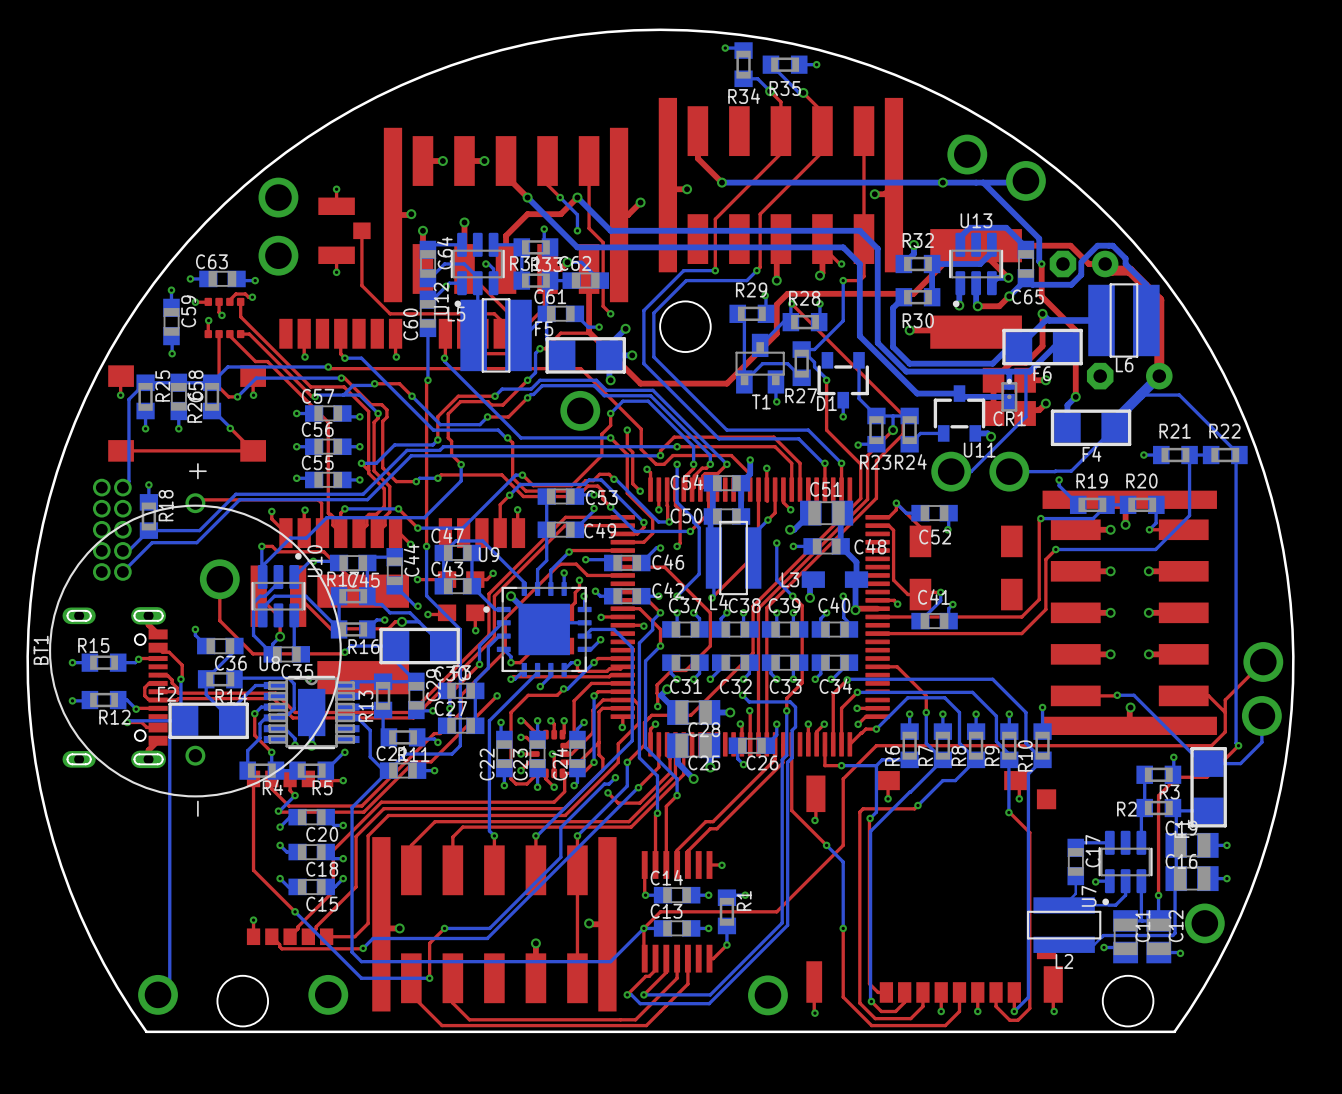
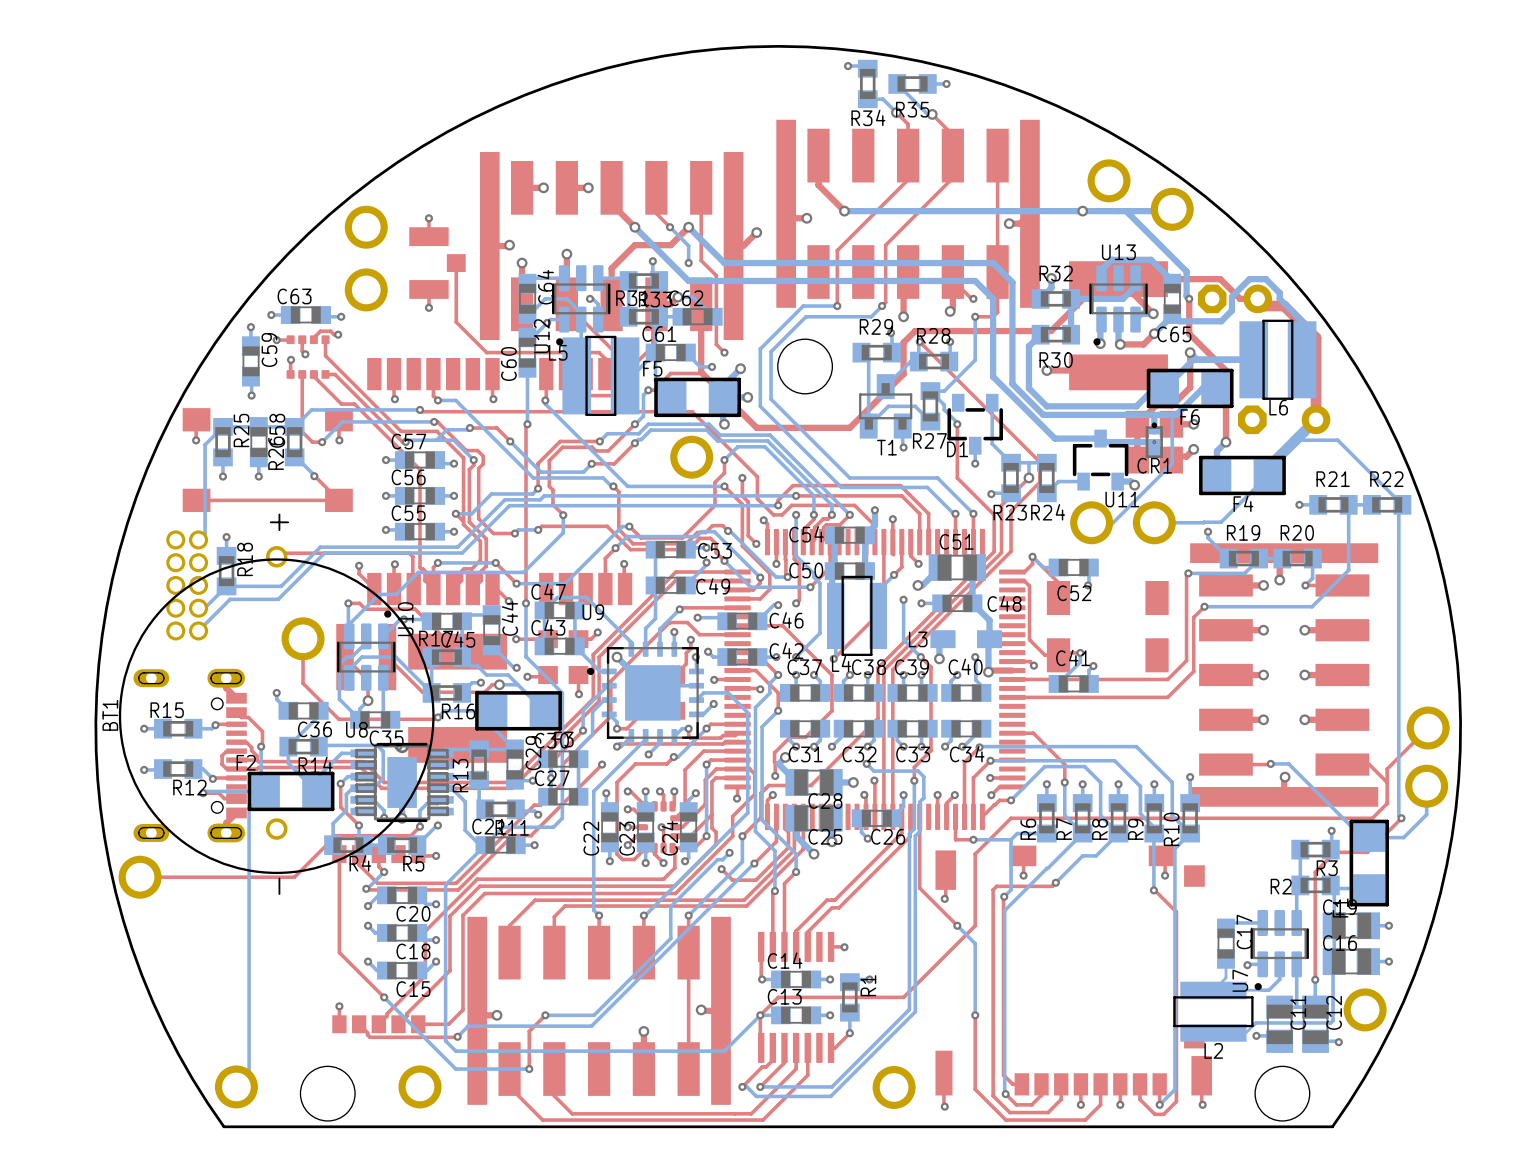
bottom track: none -> (441, 799) (437, 803) (427, 803) (420, 810) (420, 826)
top track: none -> (420, 826) (410, 835) (335, 835) (294, 877) (140, 877)
via: none -> (420, 826)
part: none -> (140, 877)

